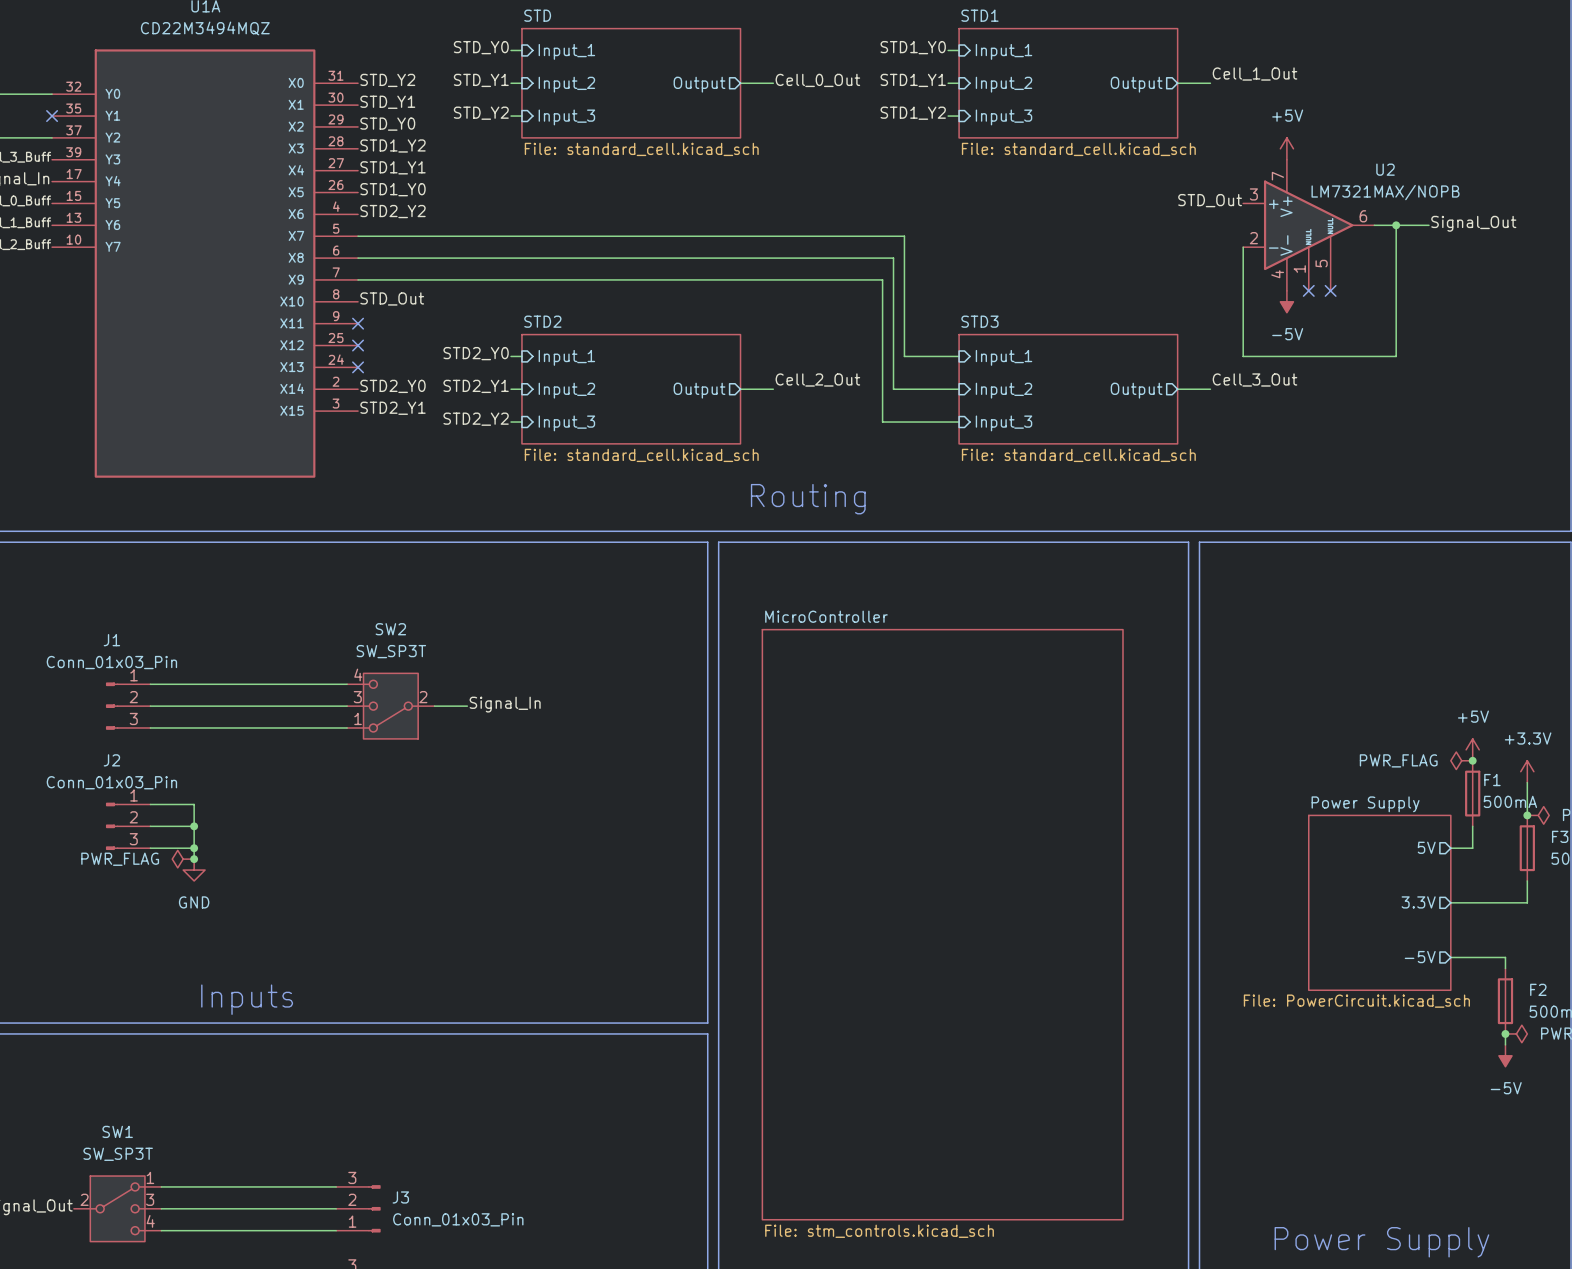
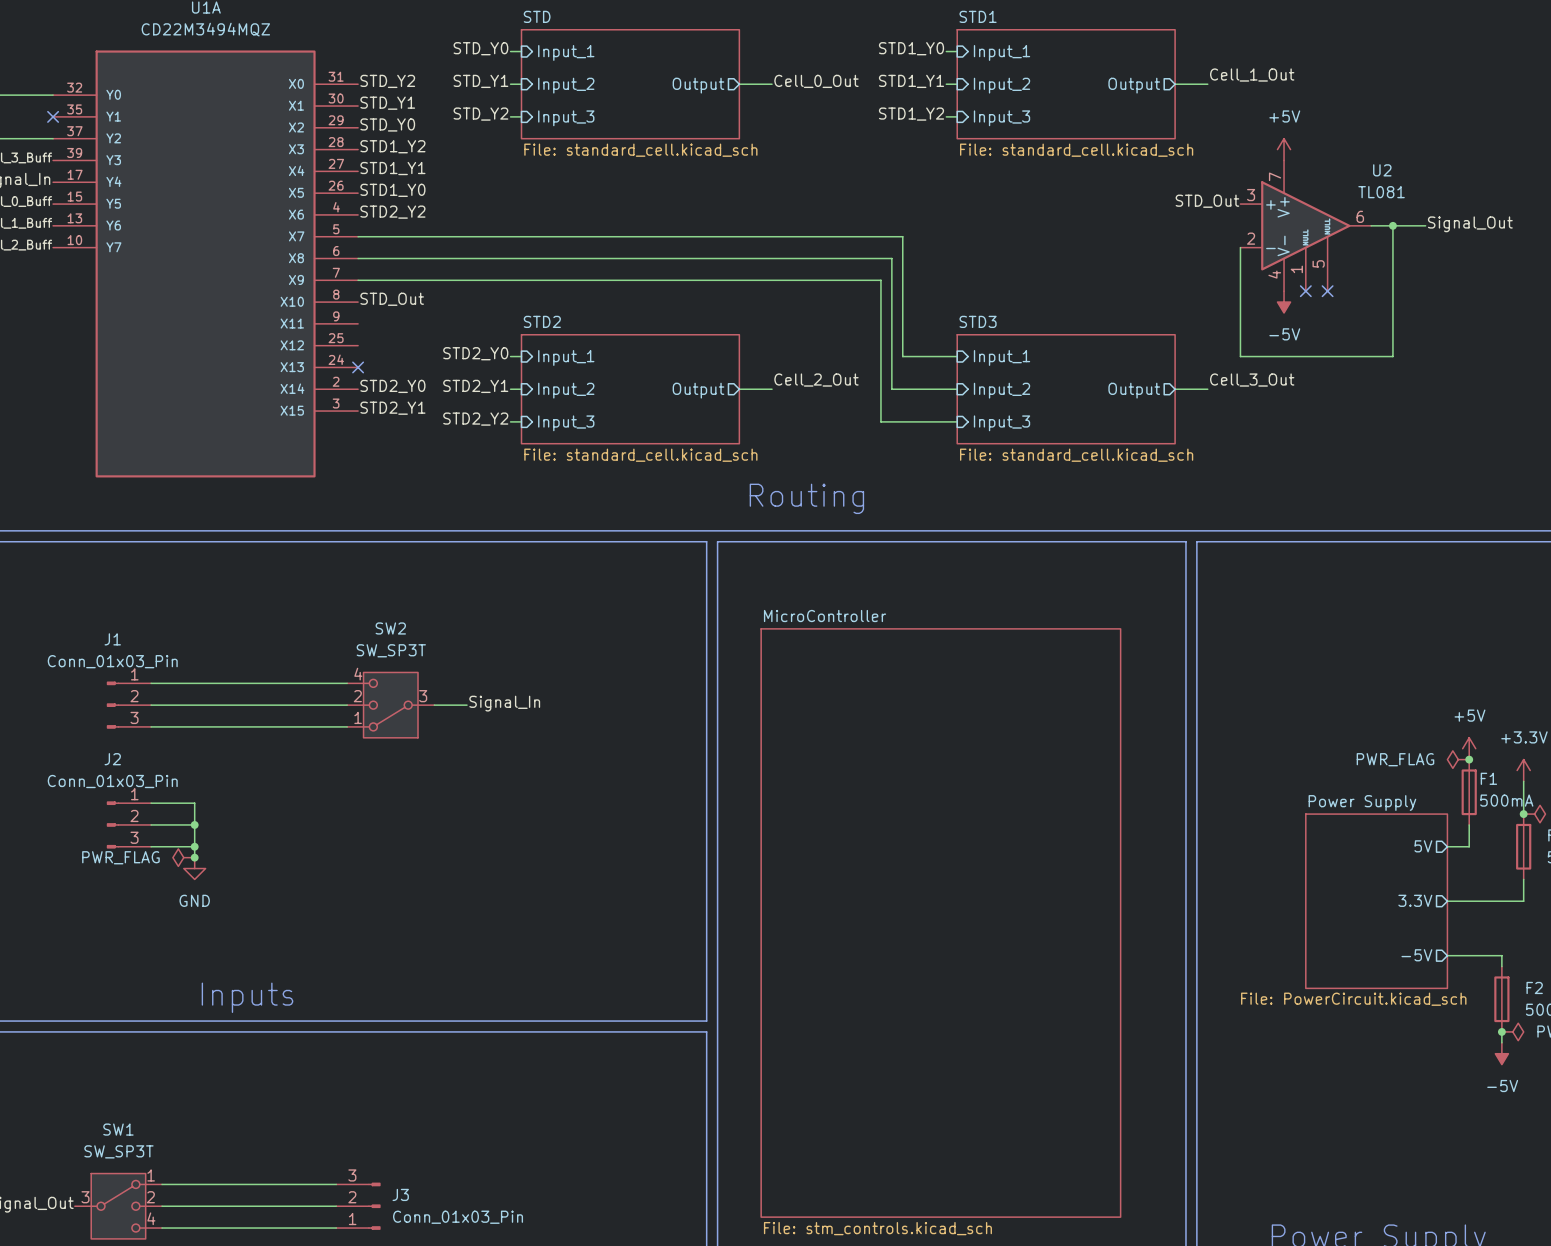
U2 value: LM7321MAX/NOPB (1385, 192) -> TL081 (1381, 192)
no-connect mark: (358, 323) -> none
no-connect mark: (358, 345) -> none
SW2 pin number: 3 (357, 697) -> 2 (357, 696)
SW2 pin number: 2 (423, 697) -> 3 (423, 696)
SW1 pin number: 2 (84, 1199) -> 3 (85, 1197)
SW1 pin number: 3 (150, 1199) -> 2 (150, 1197)

